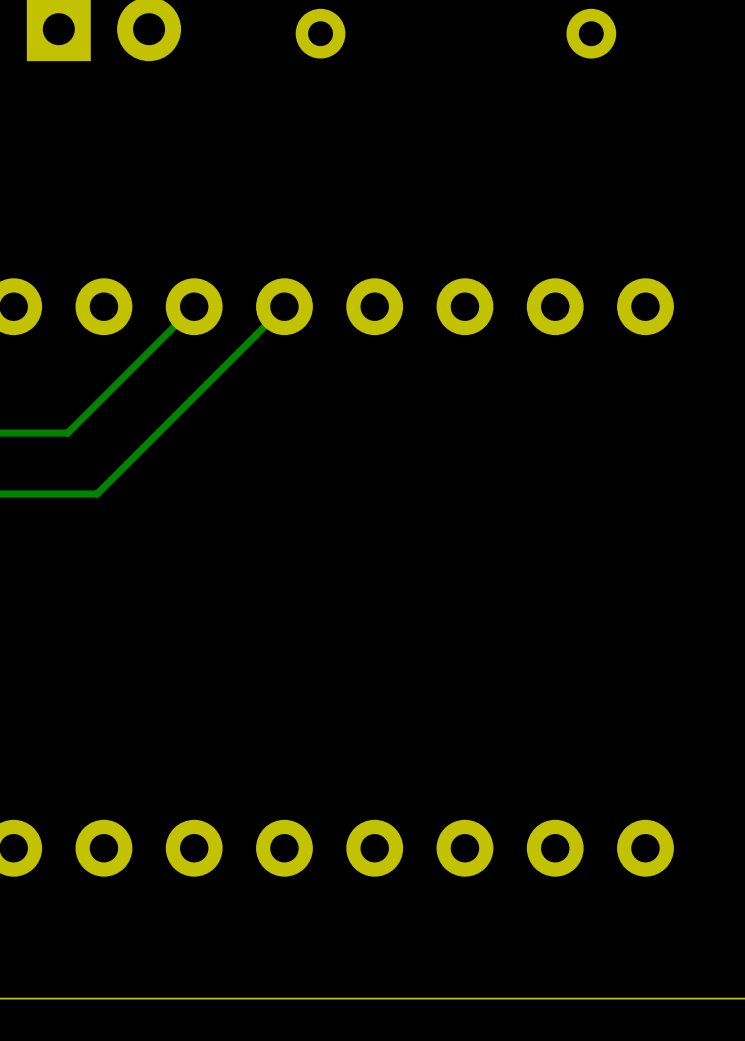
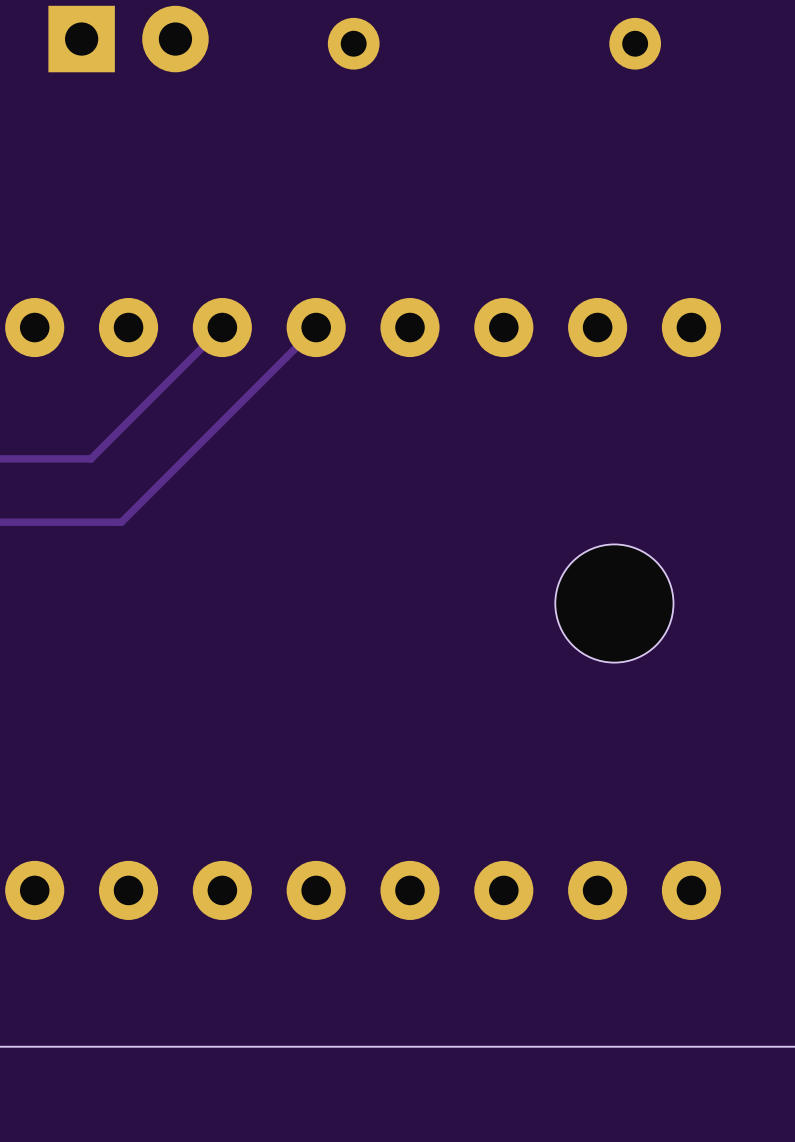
part: none -> (614, 603)

